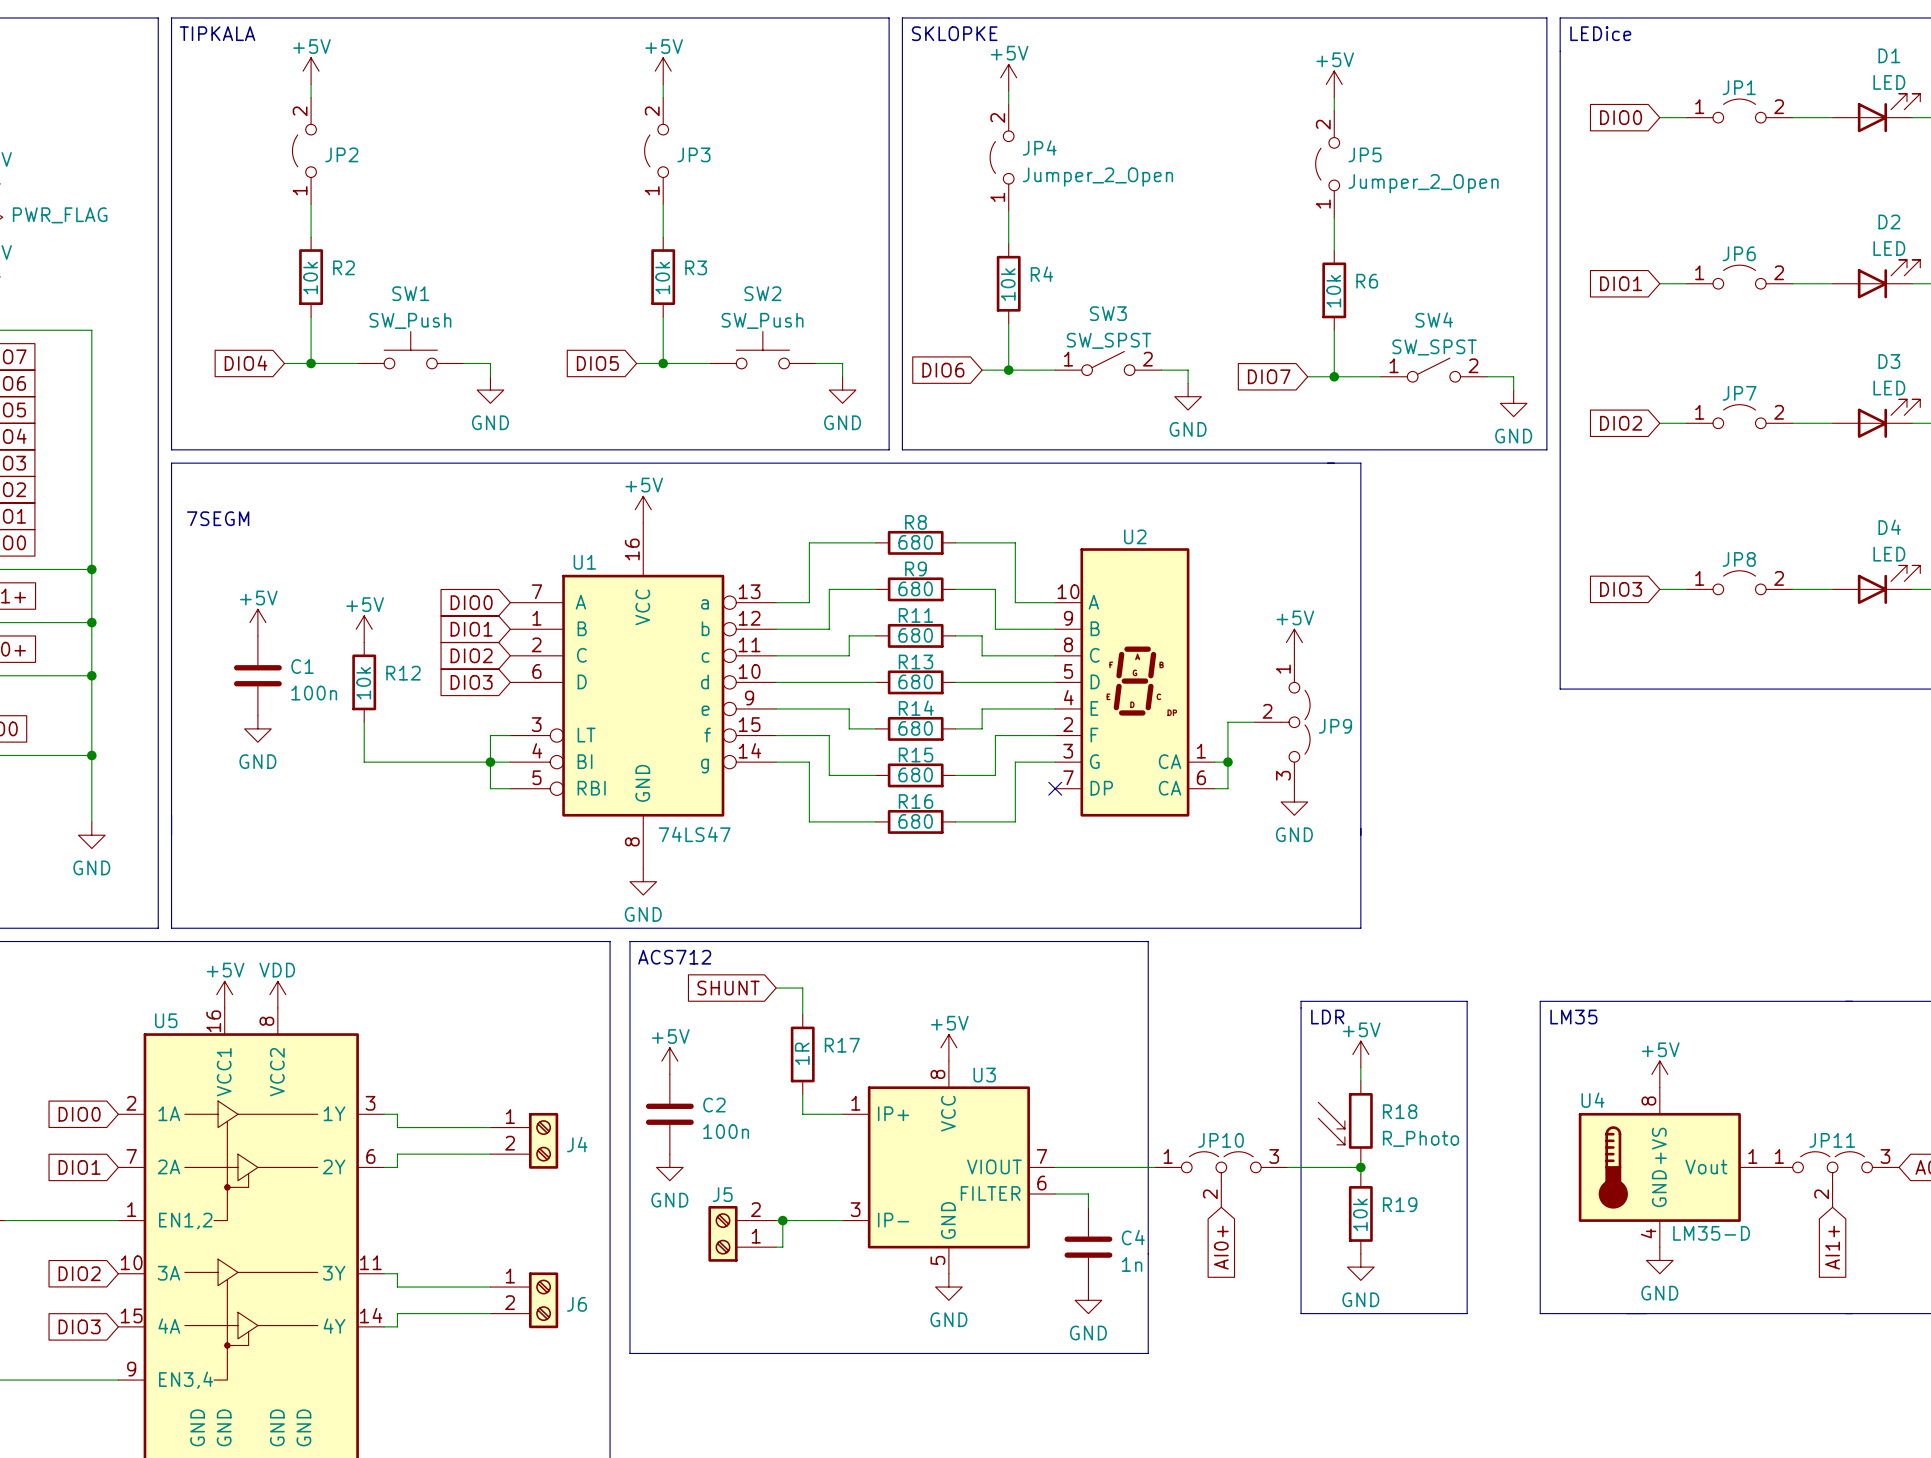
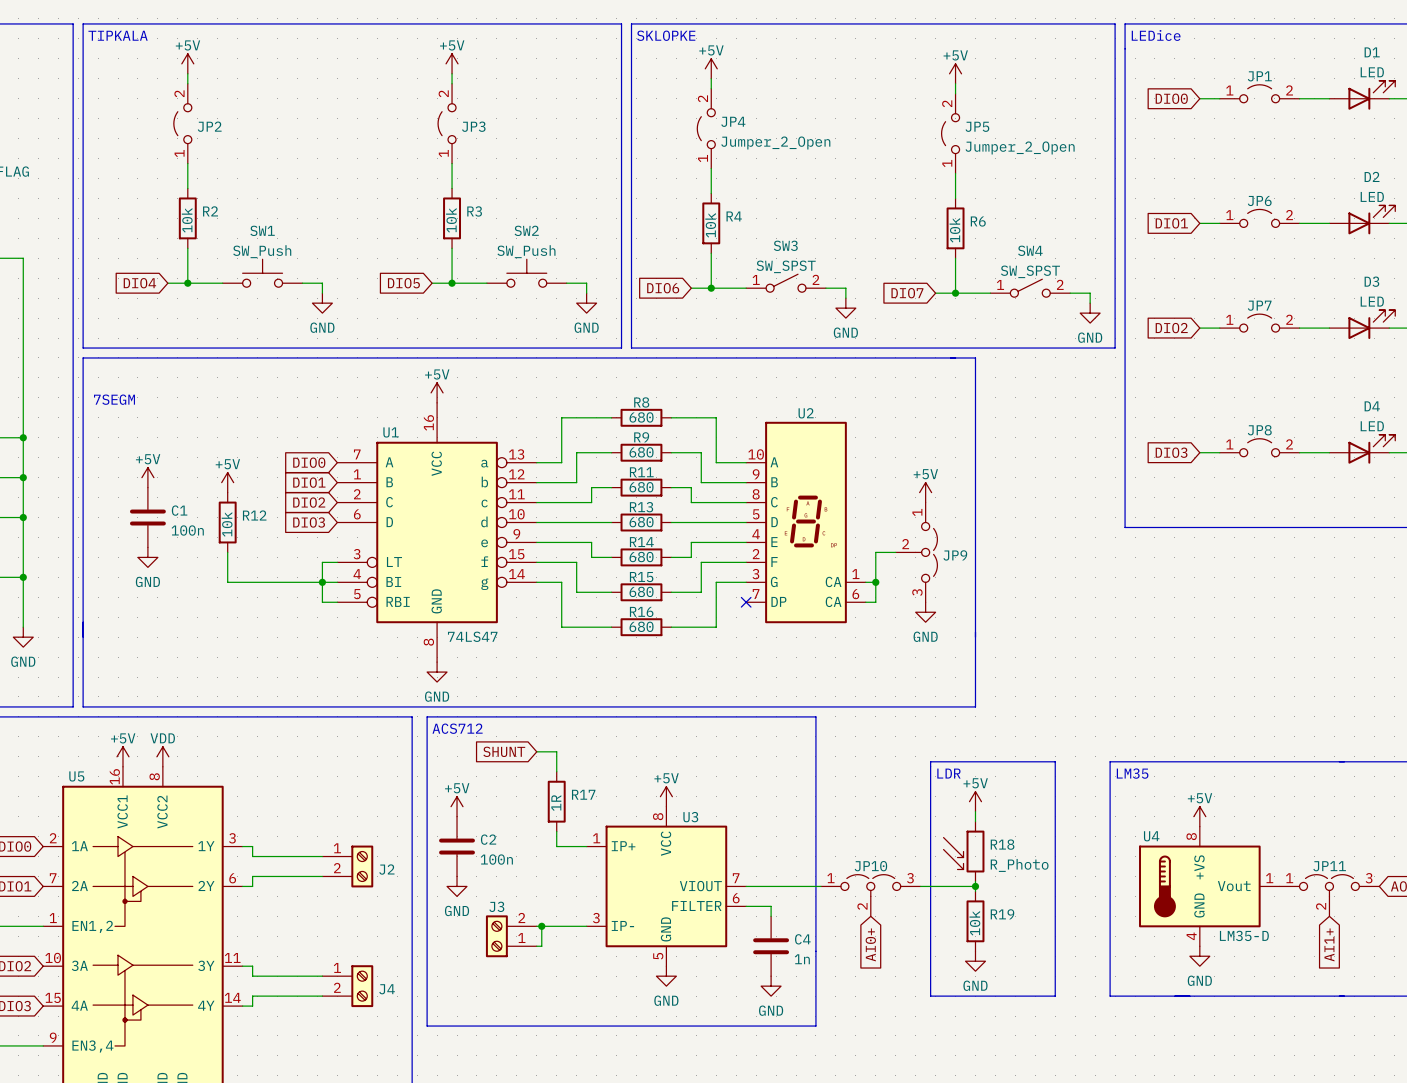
J4 name: J4 (577, 1144) -> J2 (386, 869)
J5 name: J5 (722, 1194) -> J3 (496, 906)
J6 name: J6 (576, 1304) -> J4 (387, 989)

